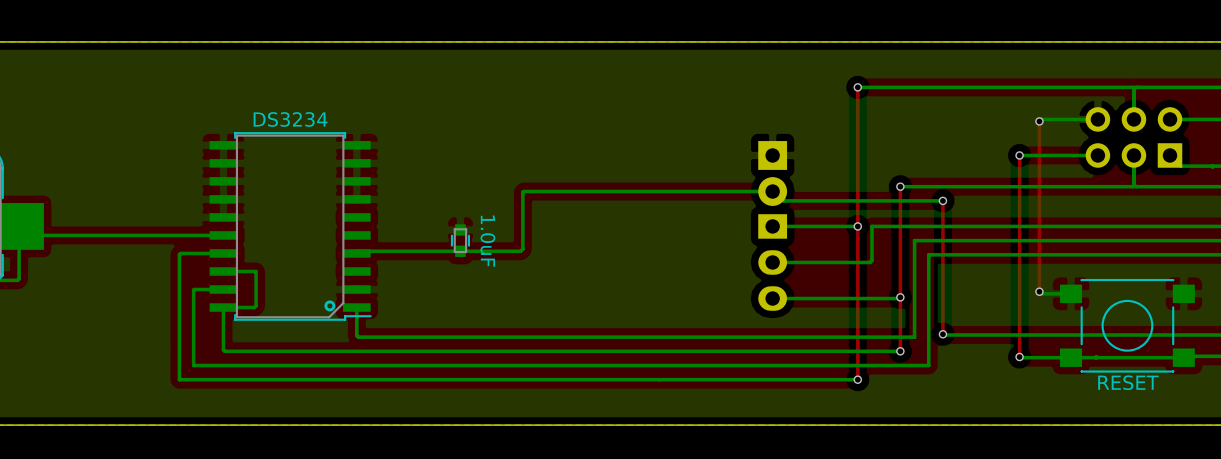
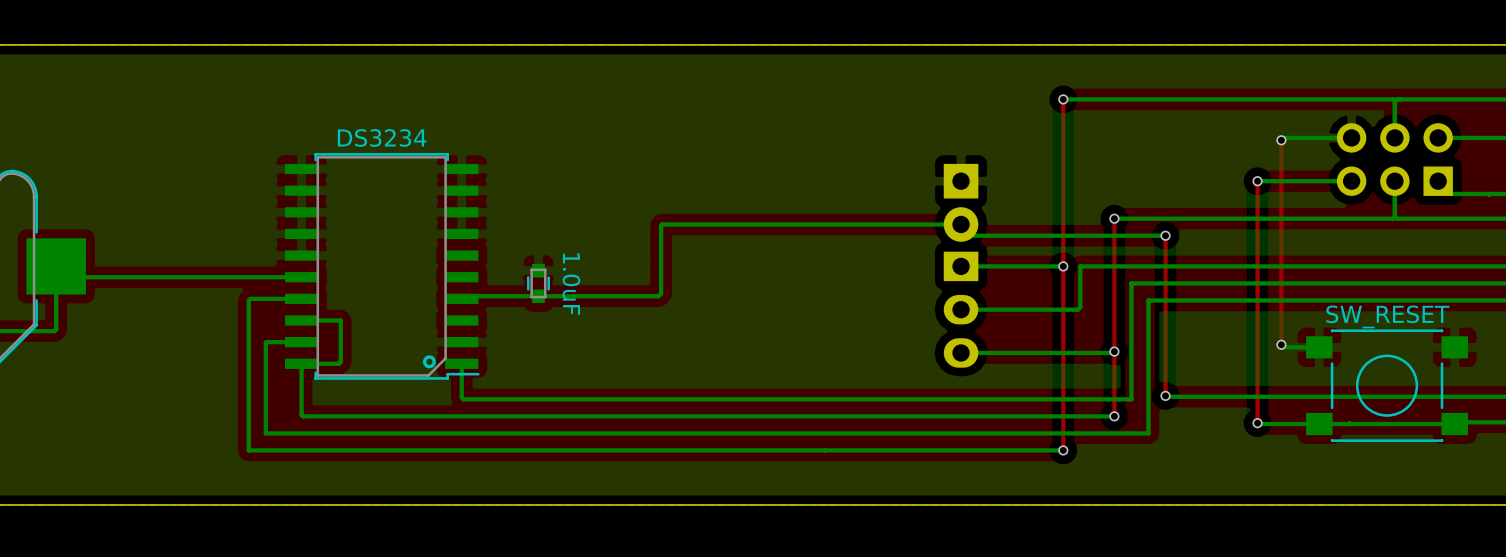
part position: (460, 240) -> (538, 283)
RESET value: none -> SW_RESET (1387, 316)
RESET name: RESET (1128, 382) -> none

